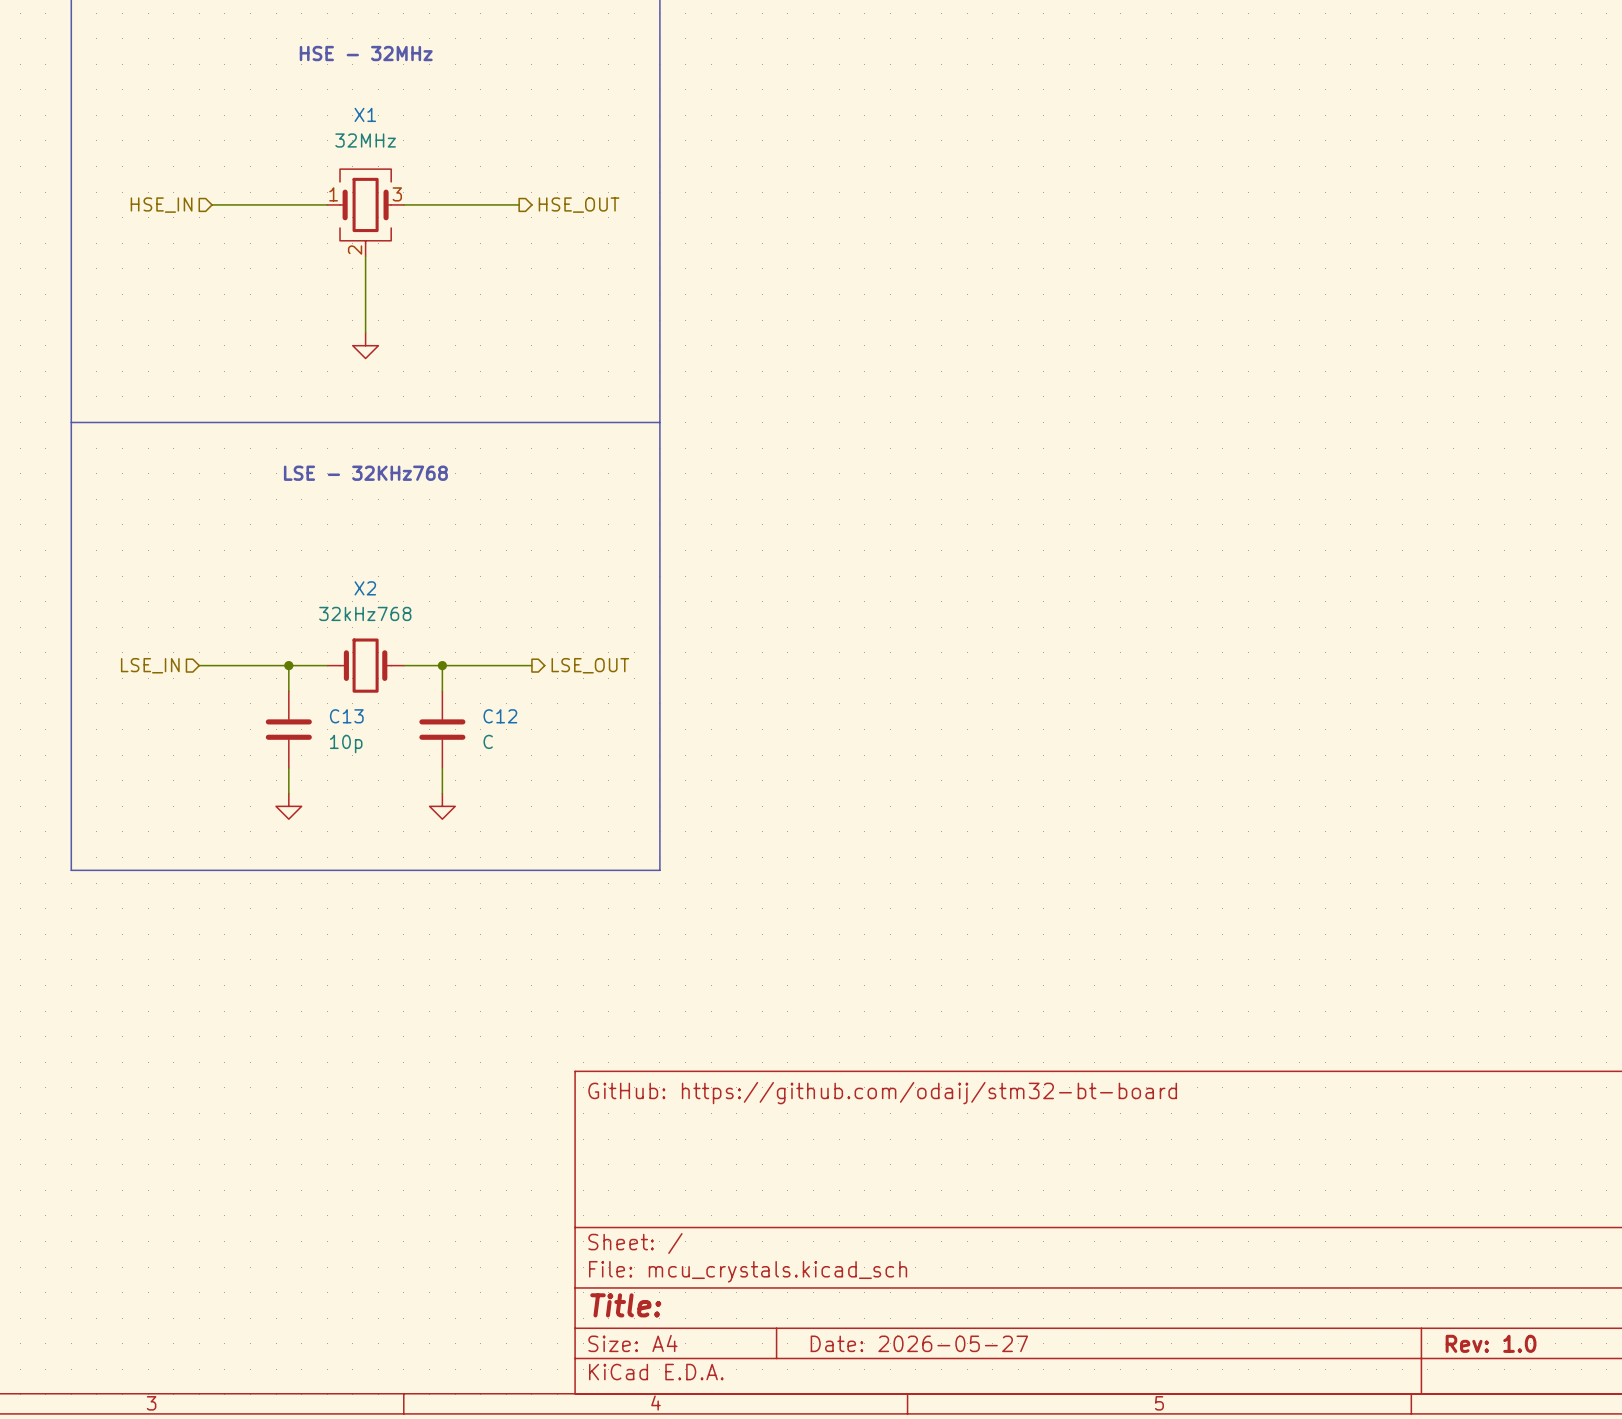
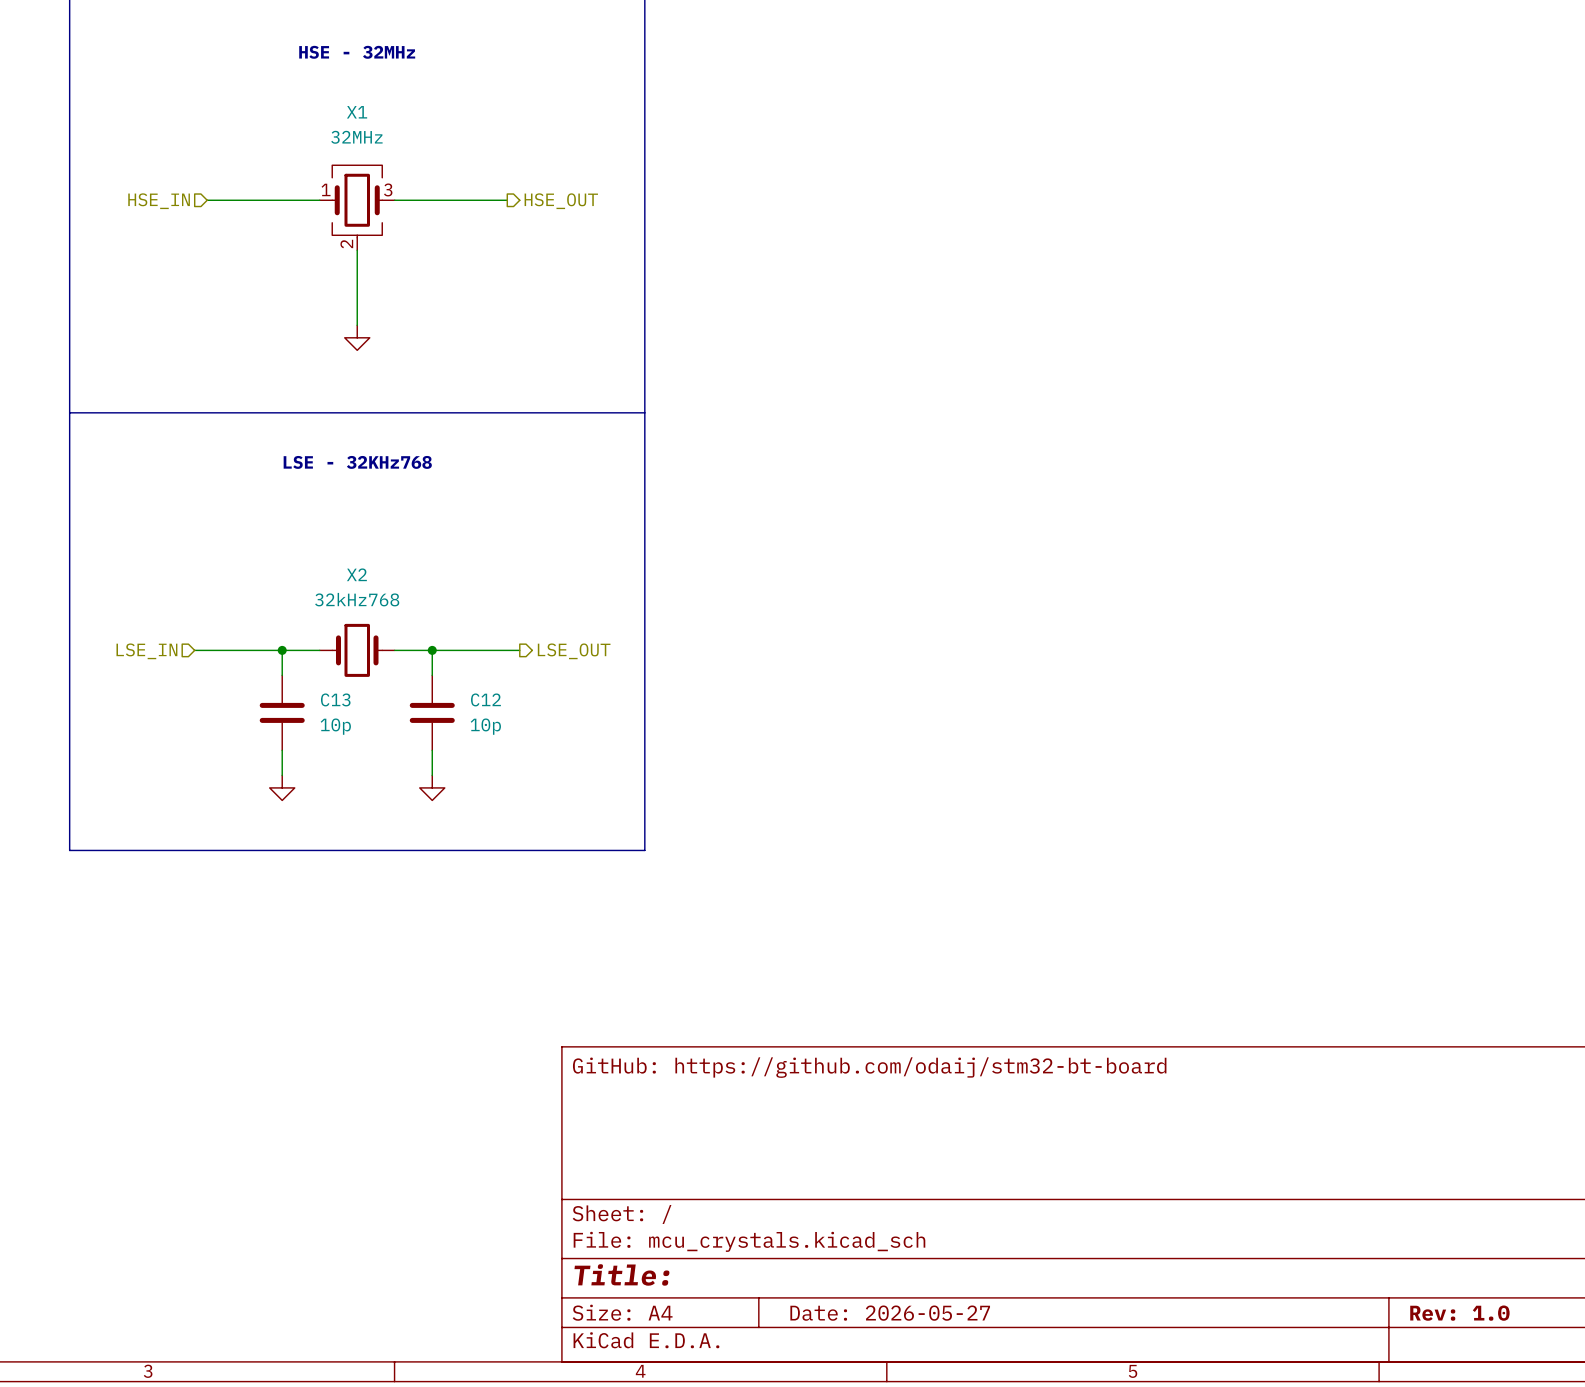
C12 value: C (488, 741) -> 10p (485, 726)

